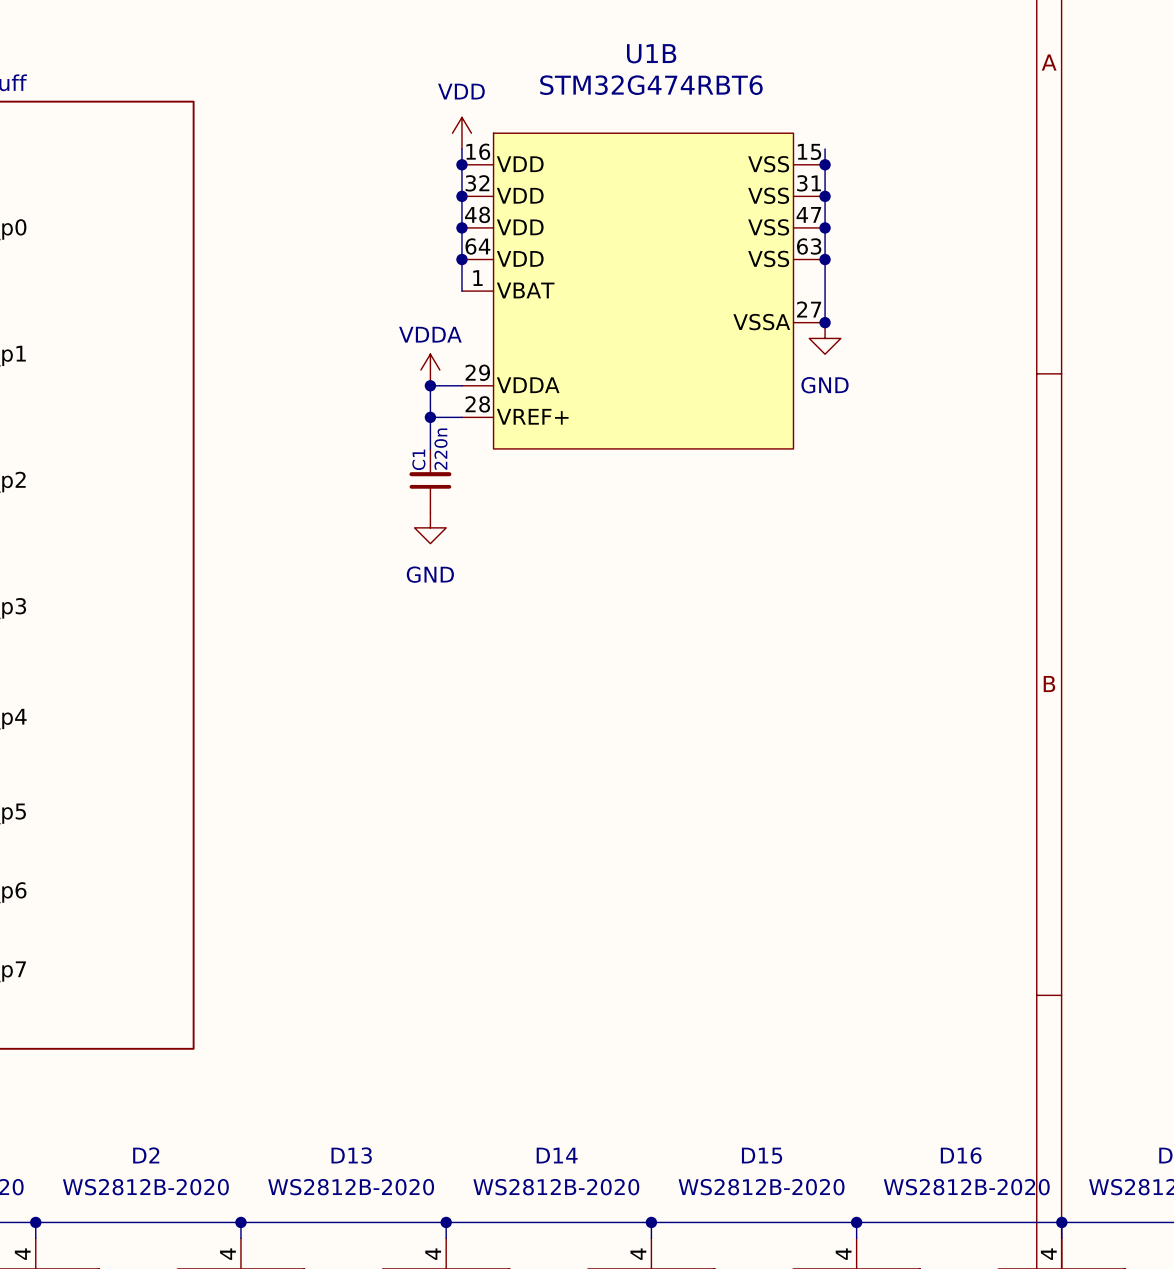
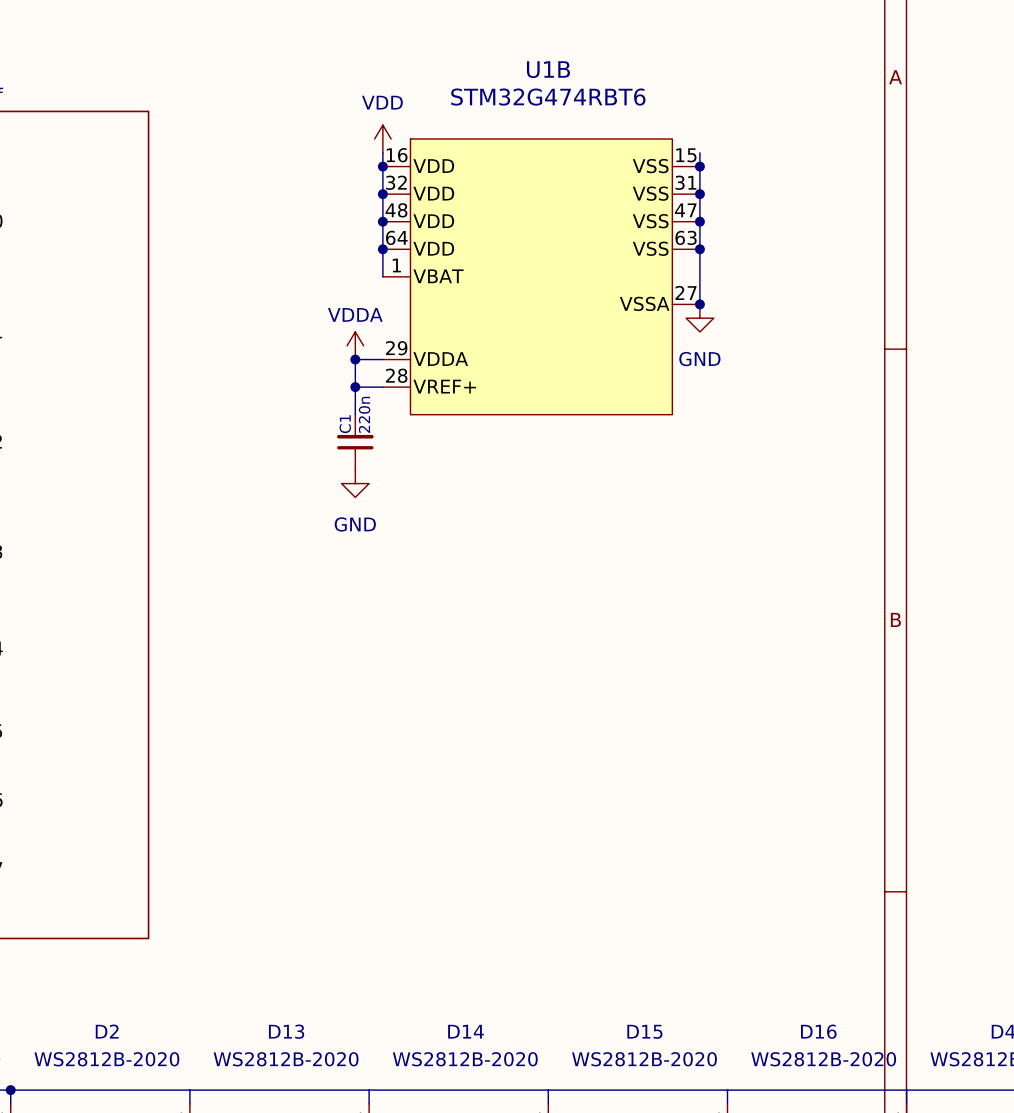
junction: (240, 1222) -> none
junction: (446, 1222) -> none
junction: (651, 1222) -> none
junction: (856, 1222) -> none
junction: (1061, 1222) -> none

